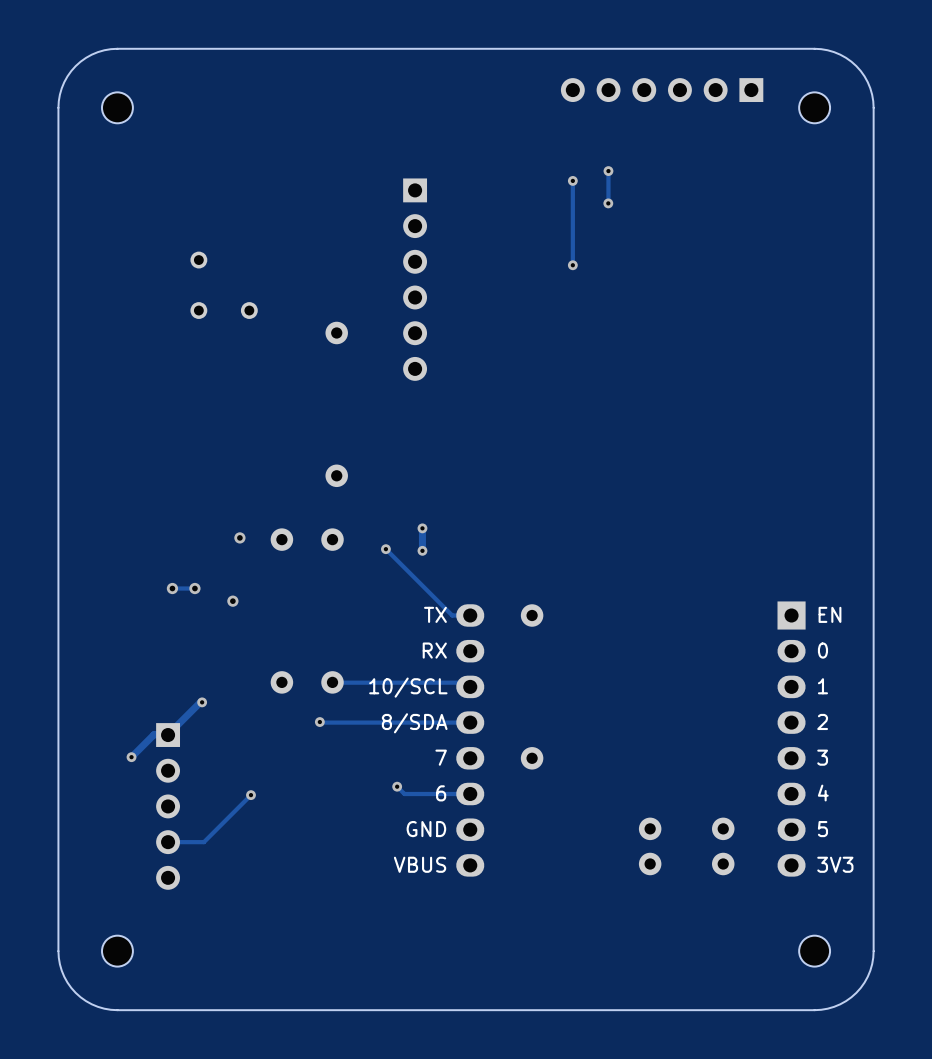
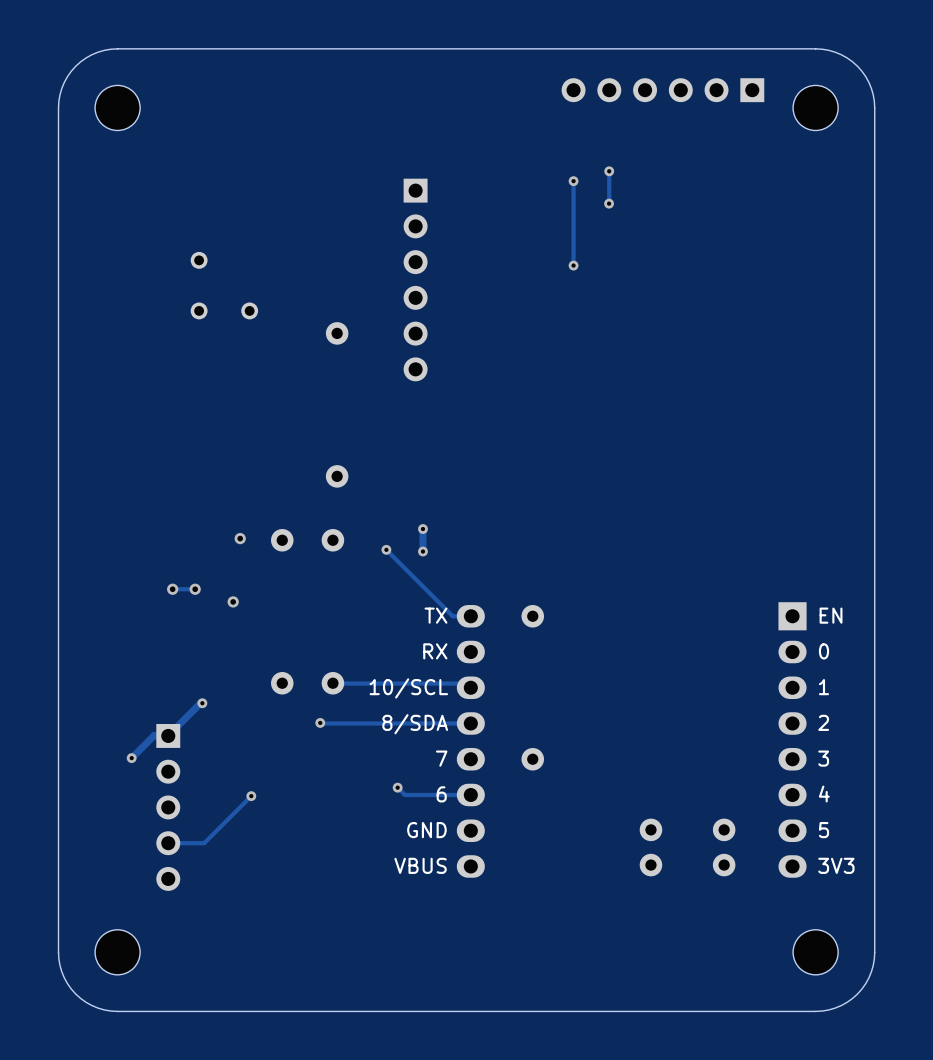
part footprint: [102, 92, 133, 124] -> [95, 85, 141, 131]
part footprint: [799, 92, 831, 124] -> [793, 85, 839, 131]
part footprint: [102, 935, 133, 967] -> [95, 929, 141, 975]
part footprint: [799, 935, 831, 967] -> [793, 929, 839, 975]

